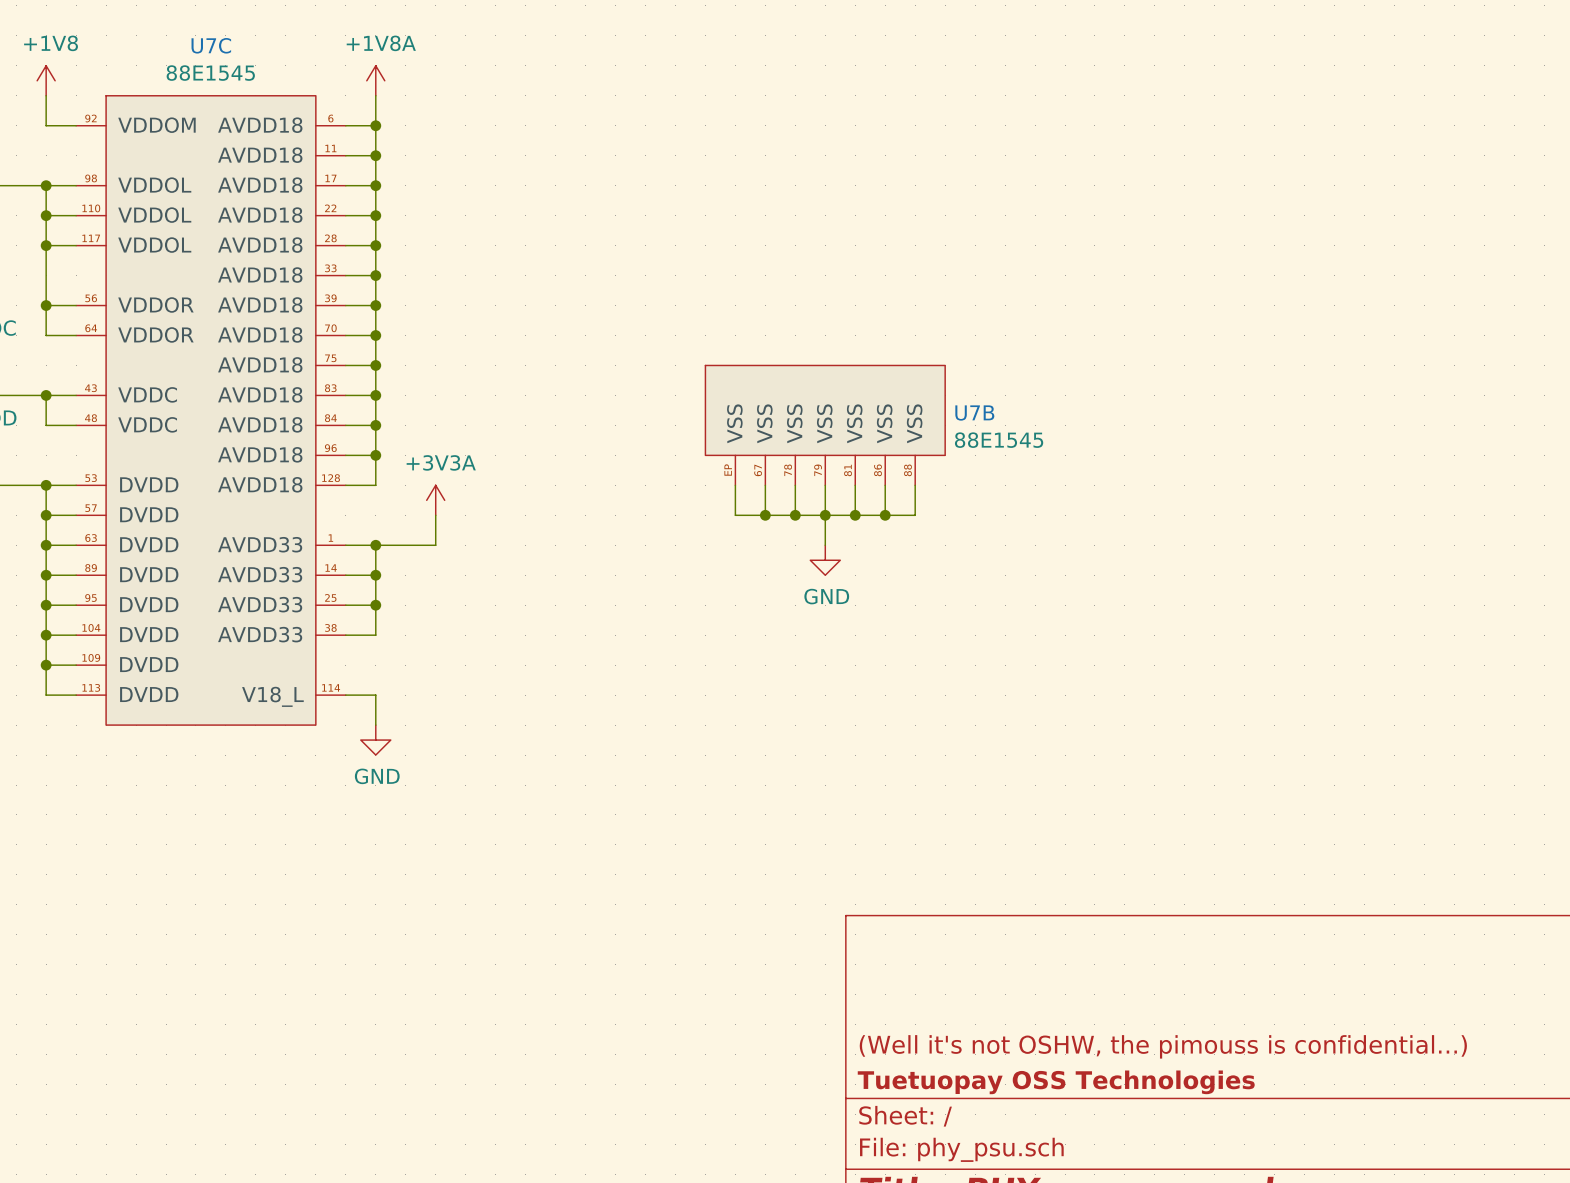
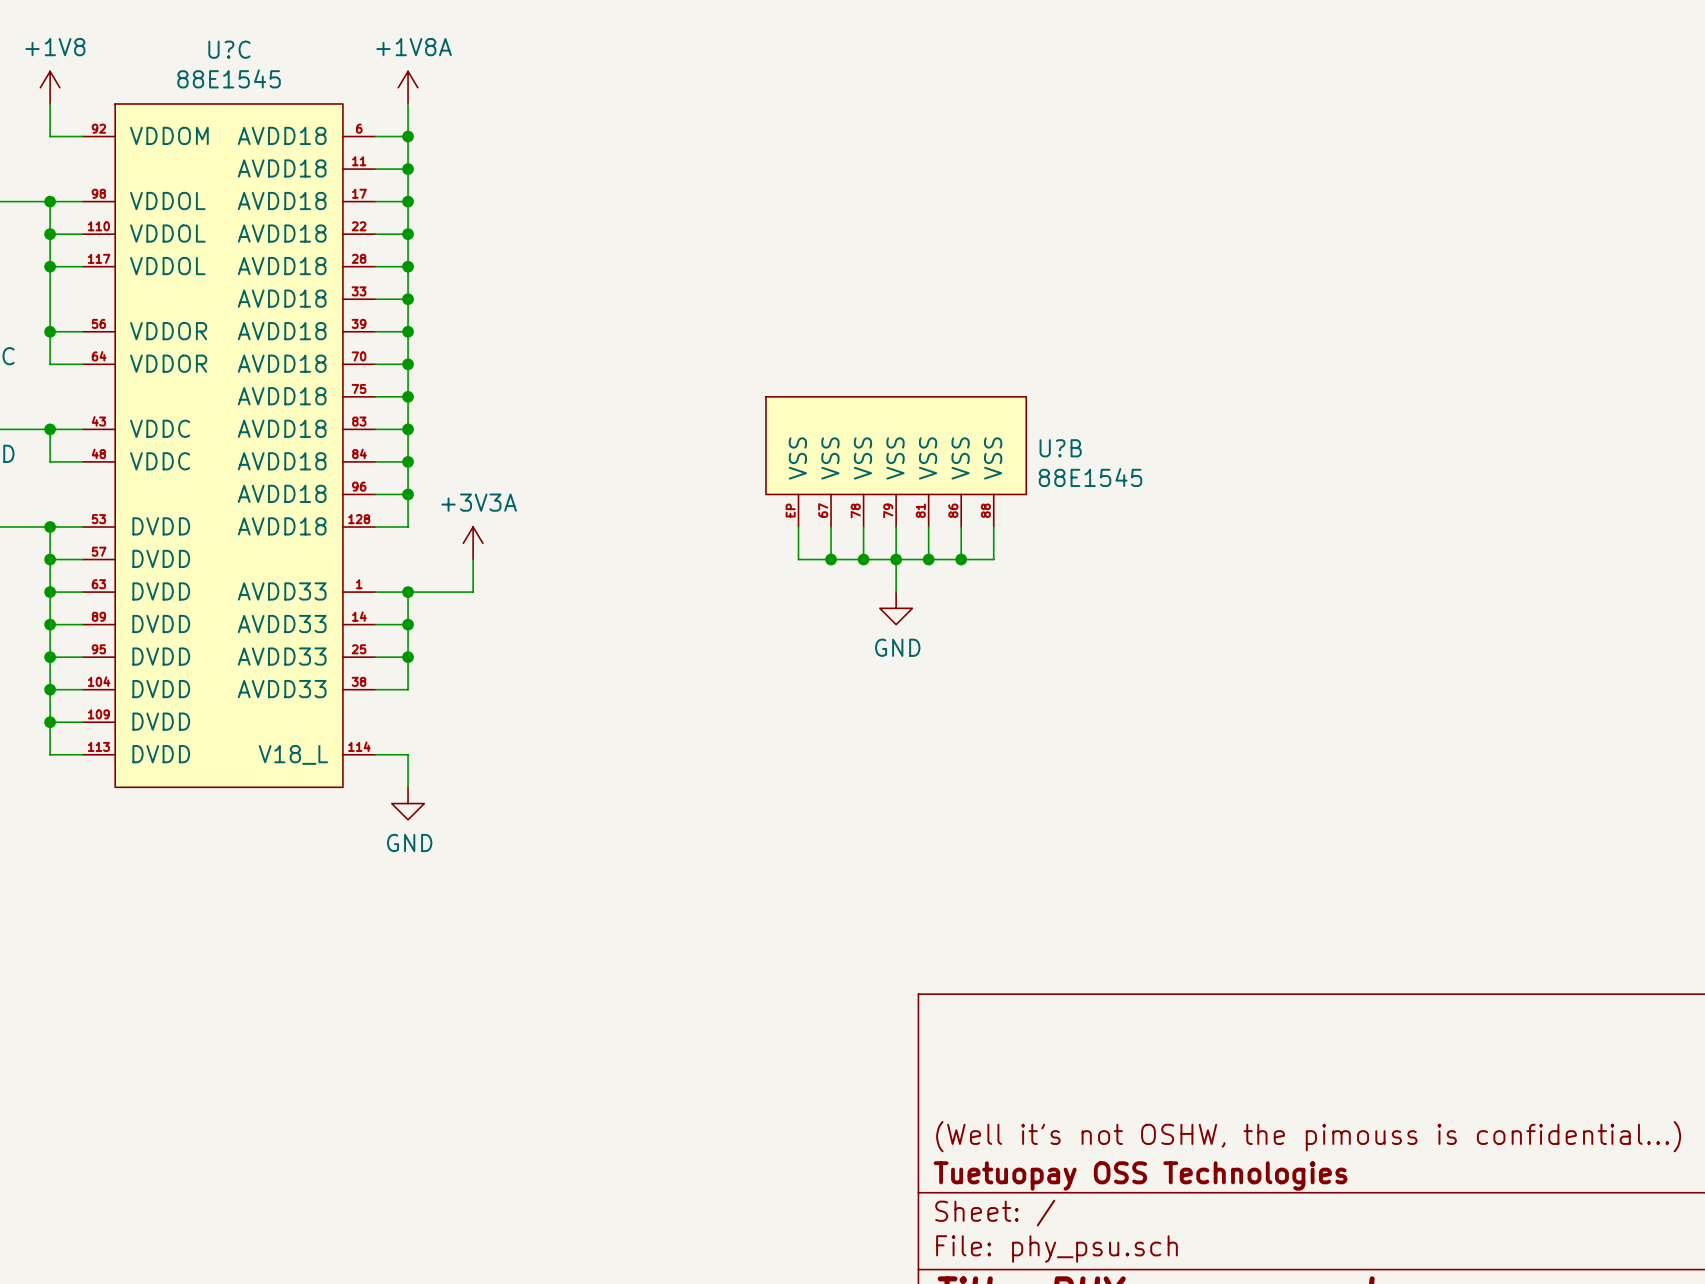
U7C name: U7C (211, 45) -> U?C (229, 49)
U7B name: U7B (974, 413) -> U?B (1060, 448)

